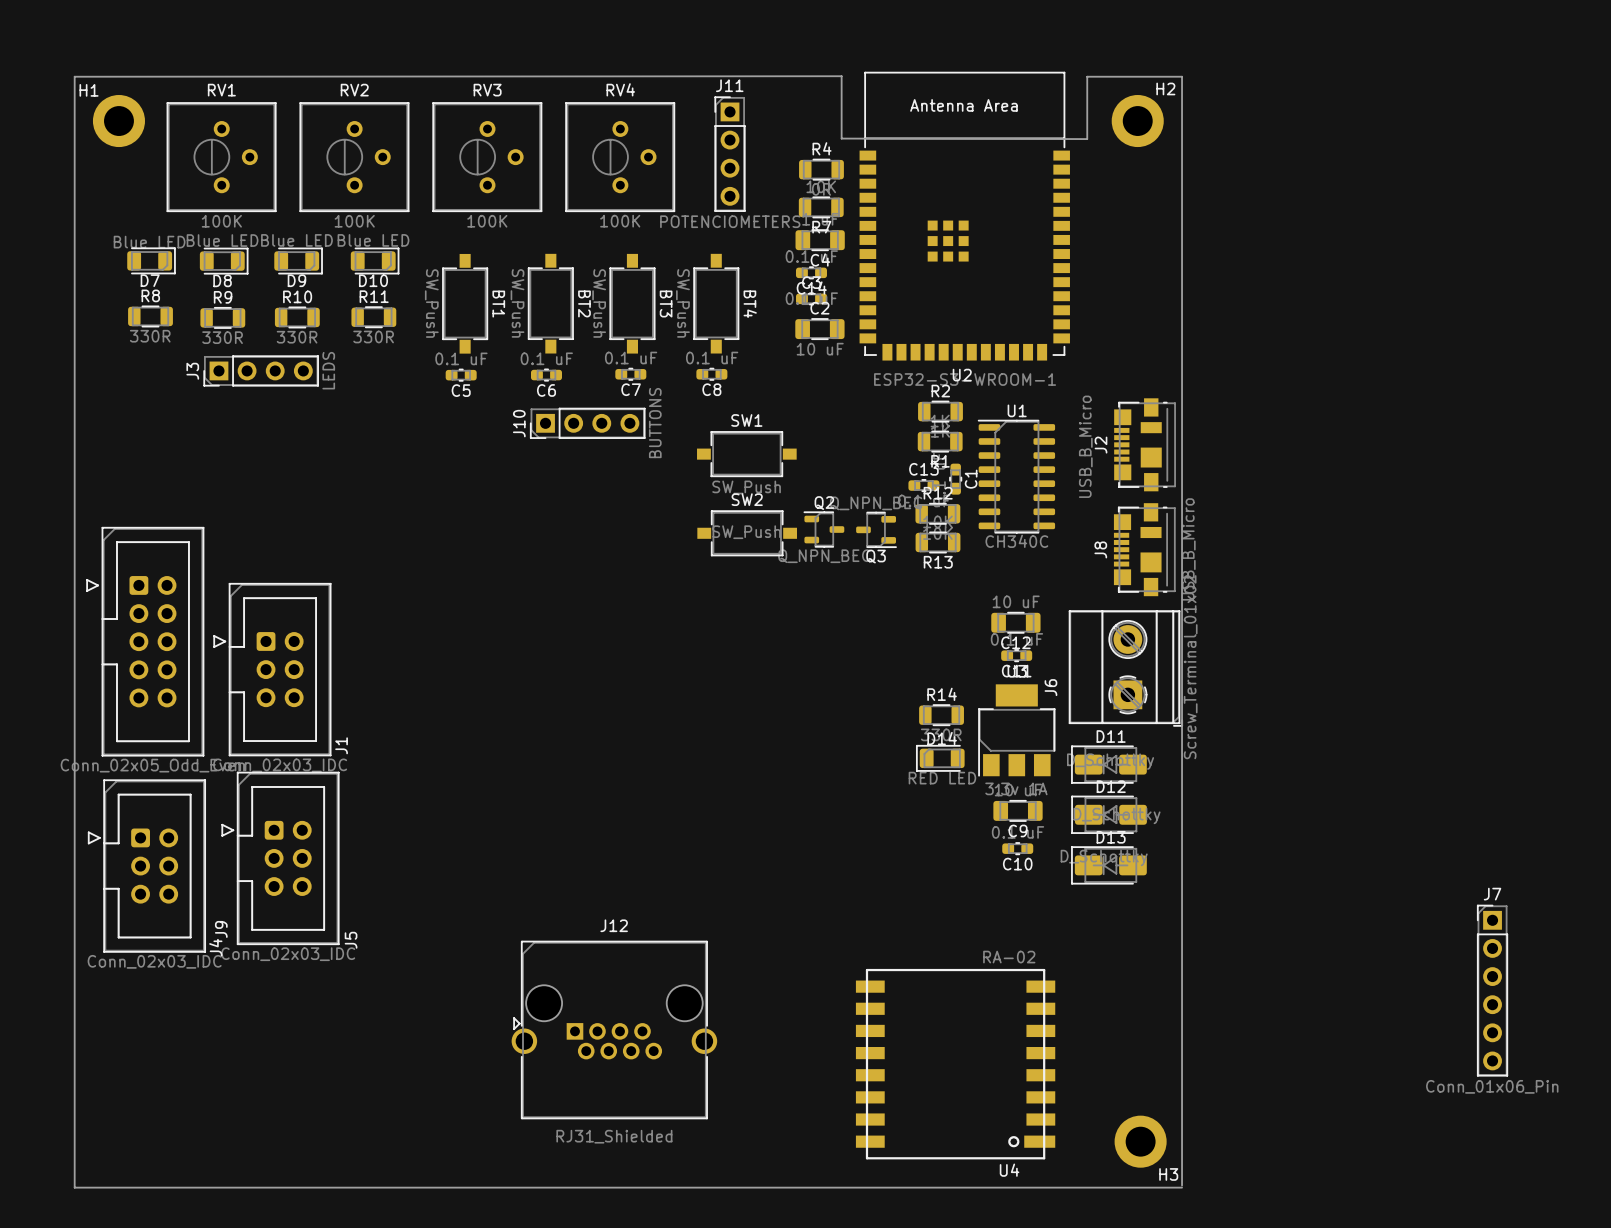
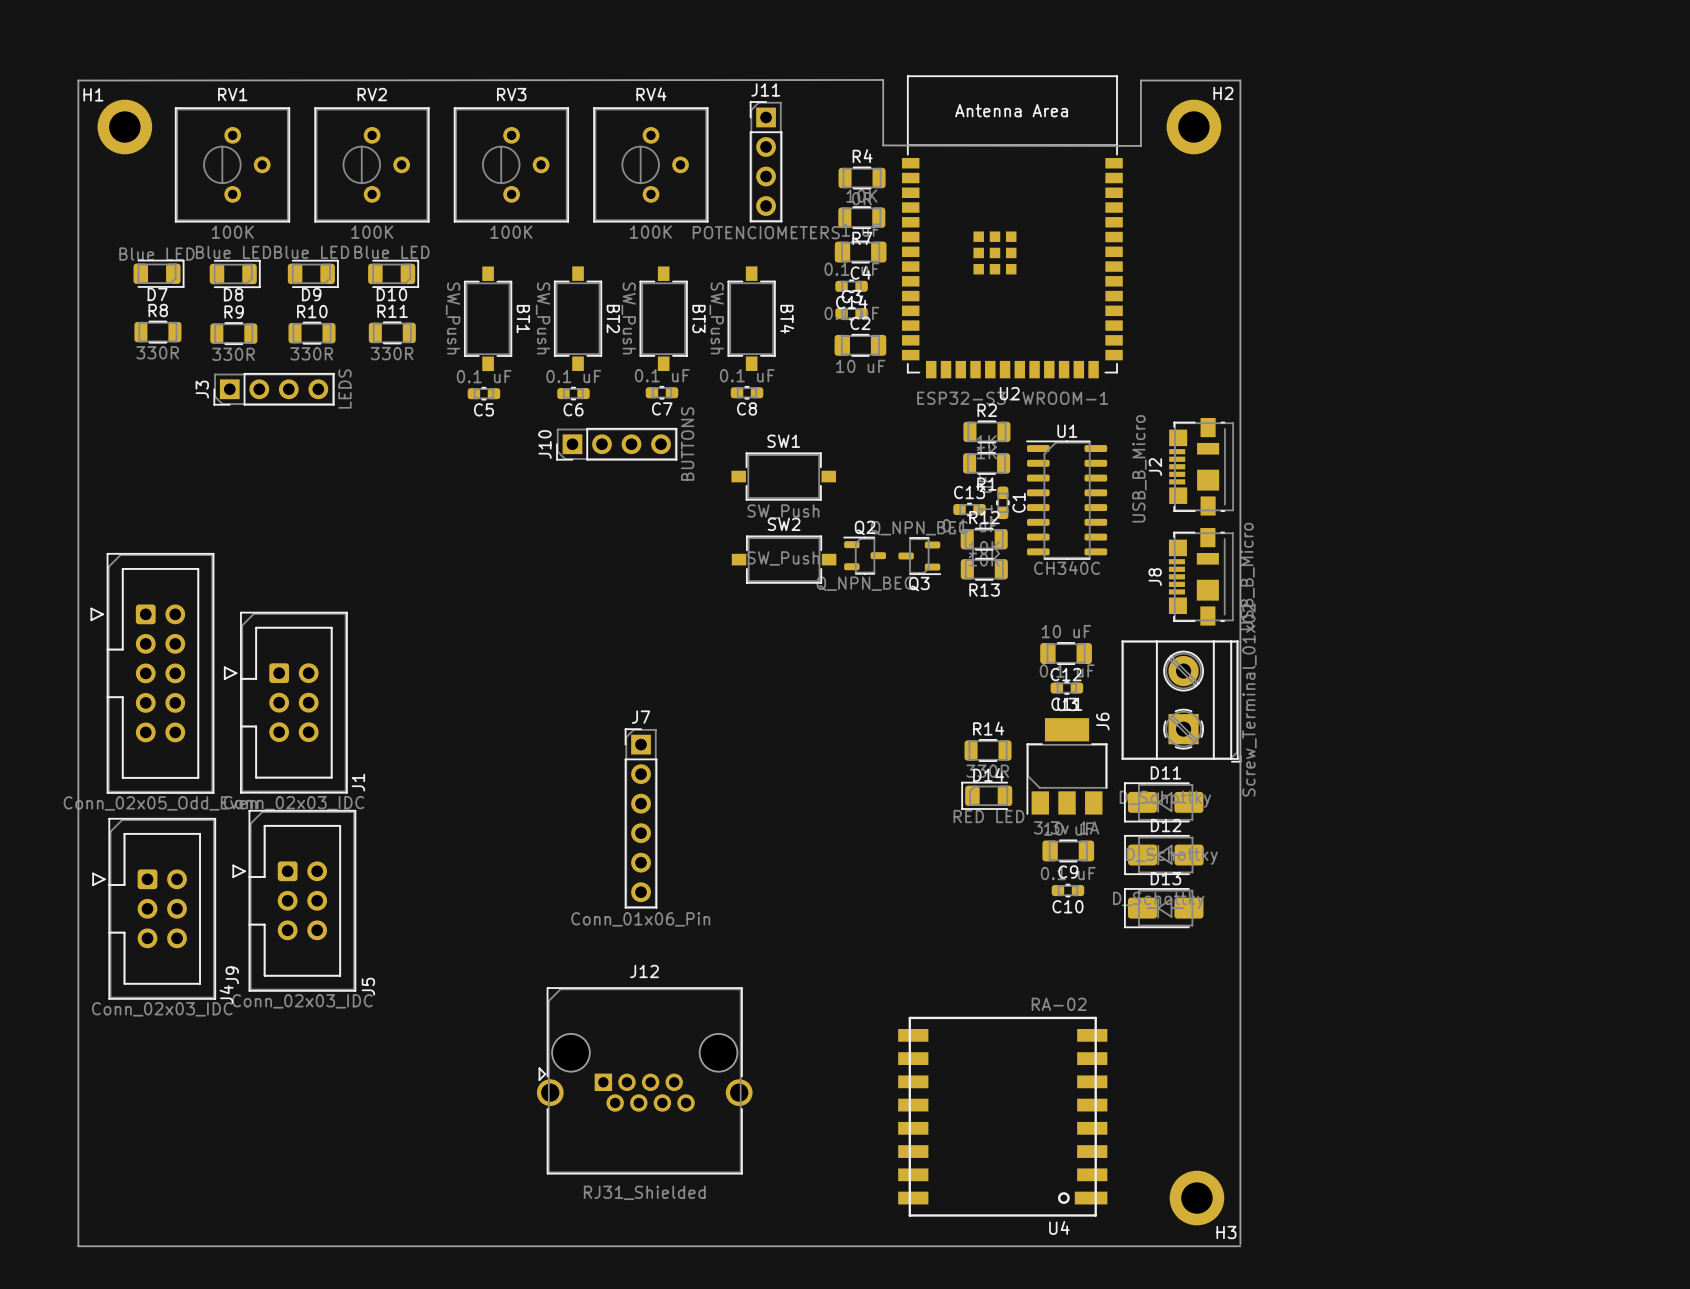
J7 position: (1492, 990) -> (641, 818)

